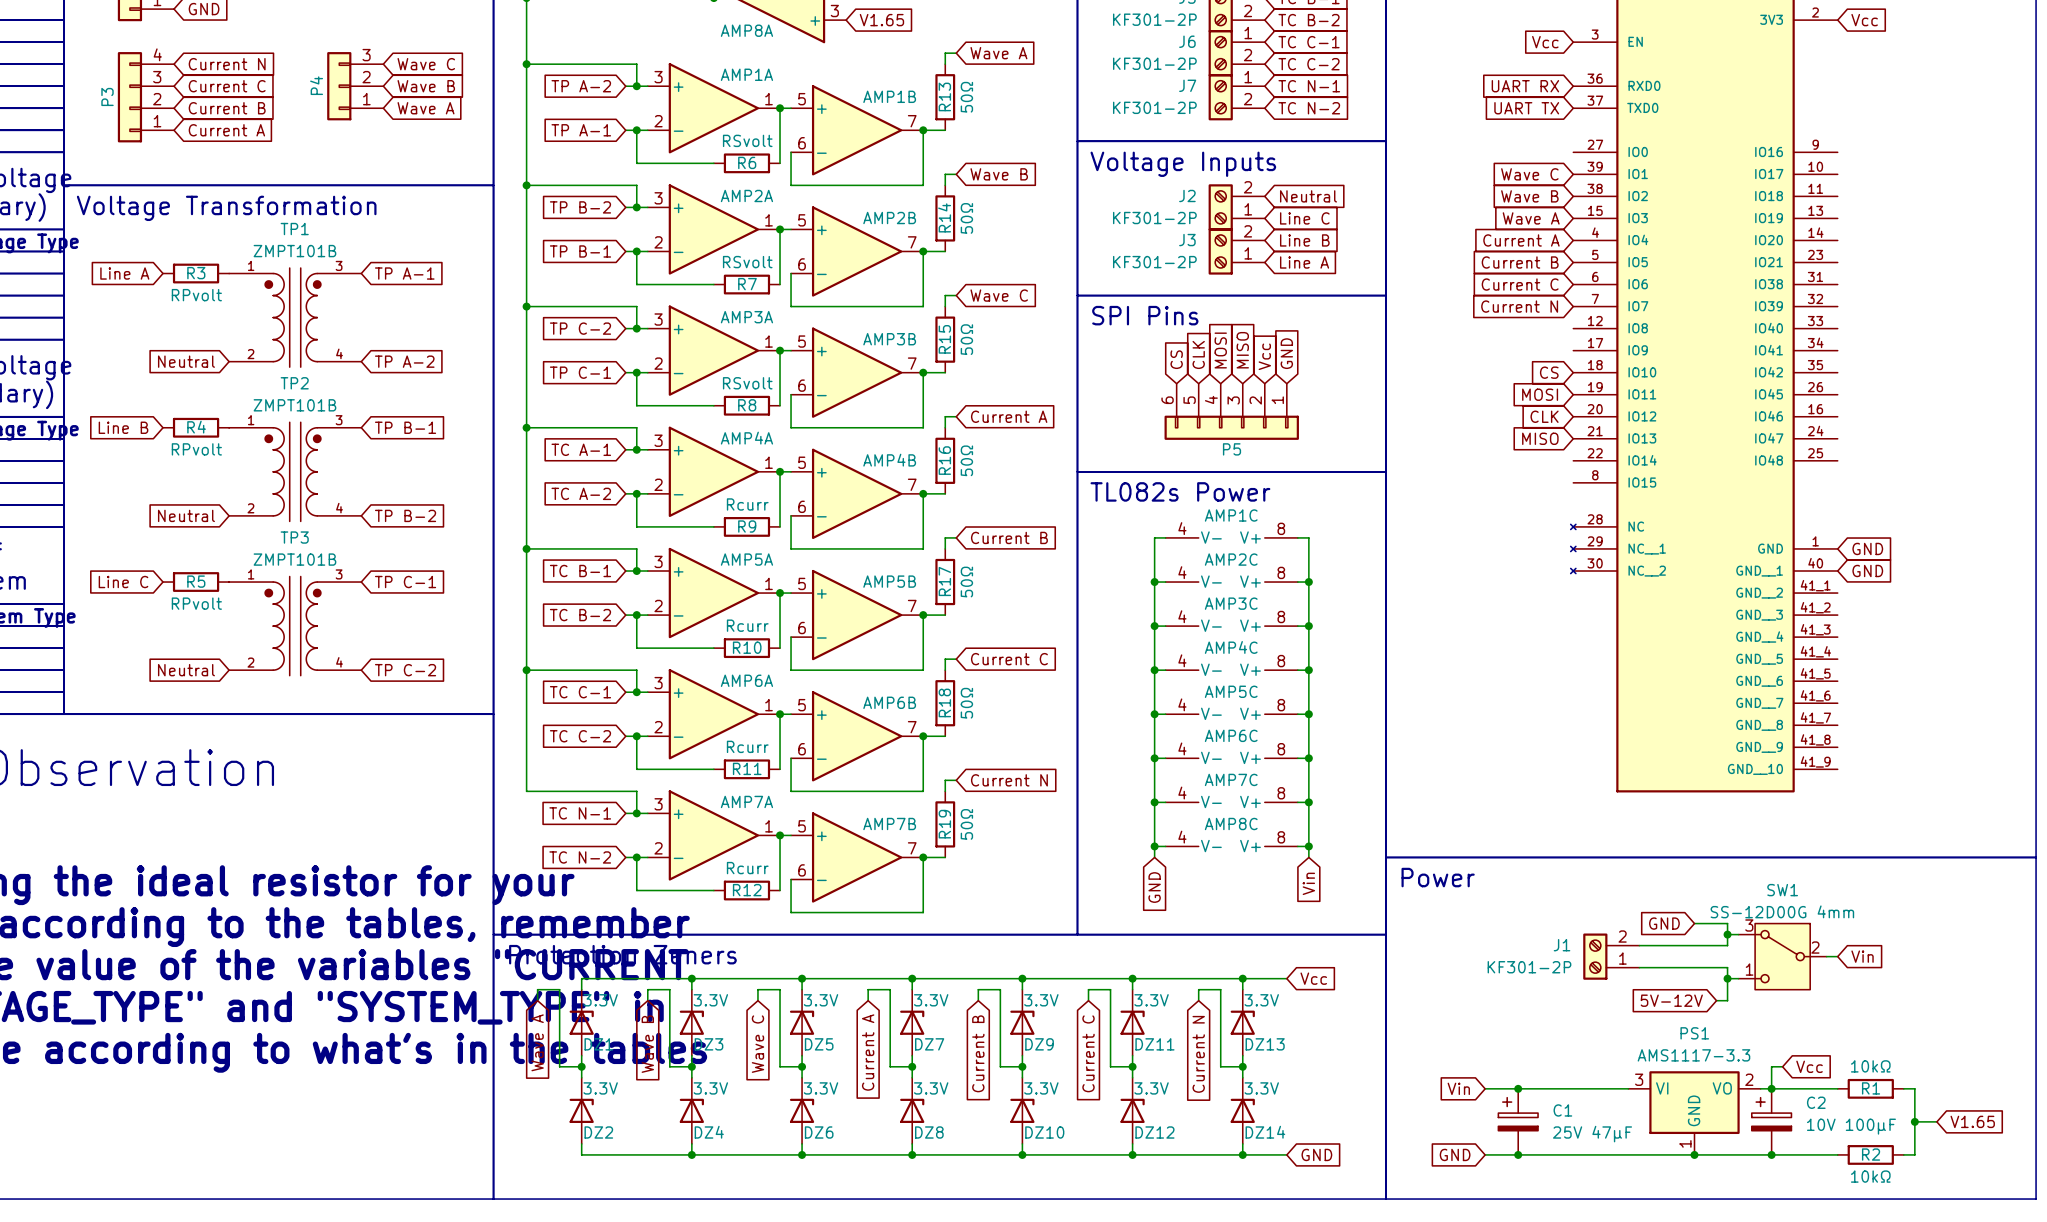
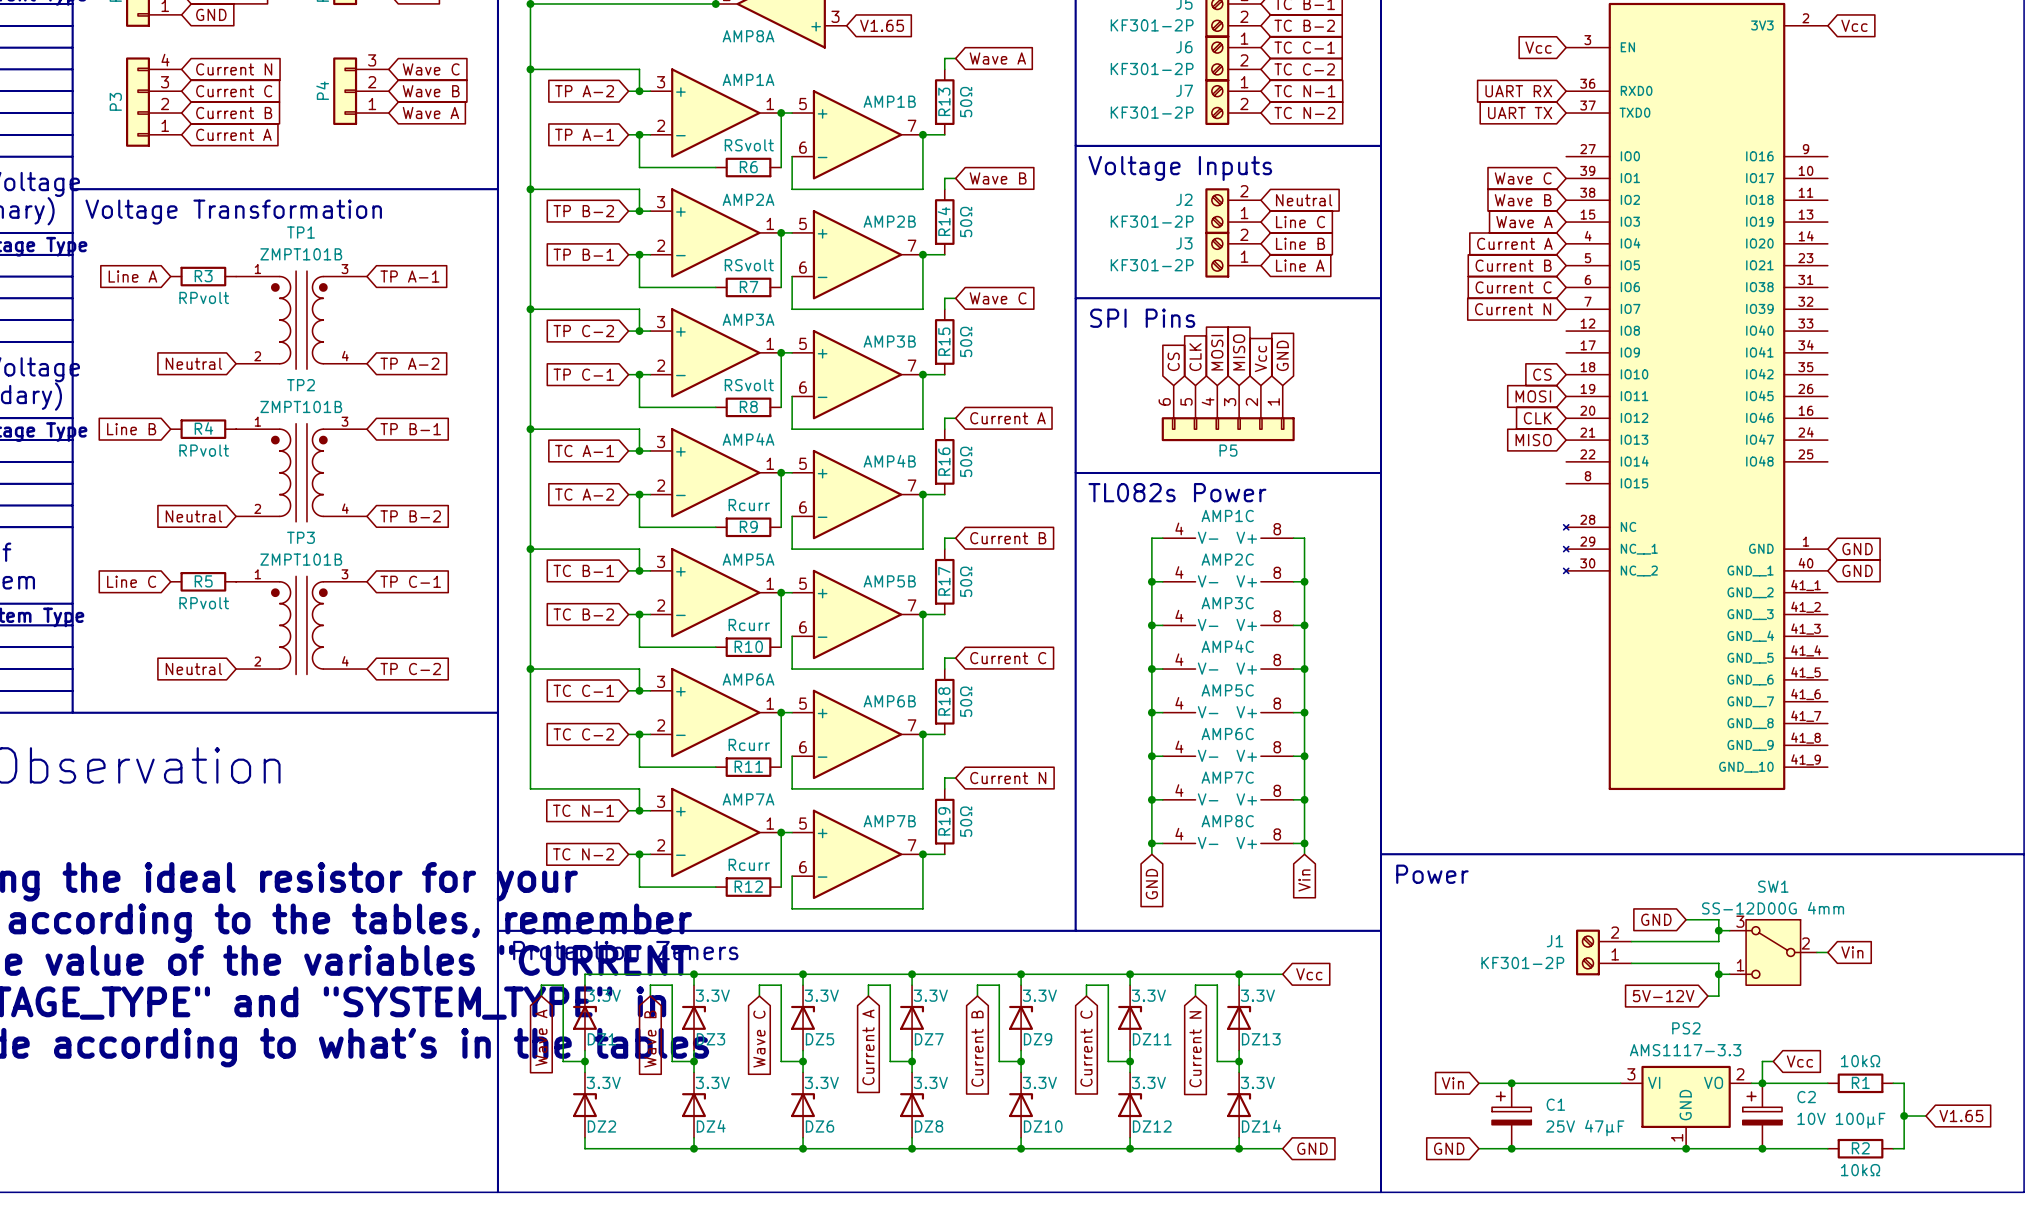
PS1 name: PS1 (1694, 1033) -> PS2 (1686, 1028)

